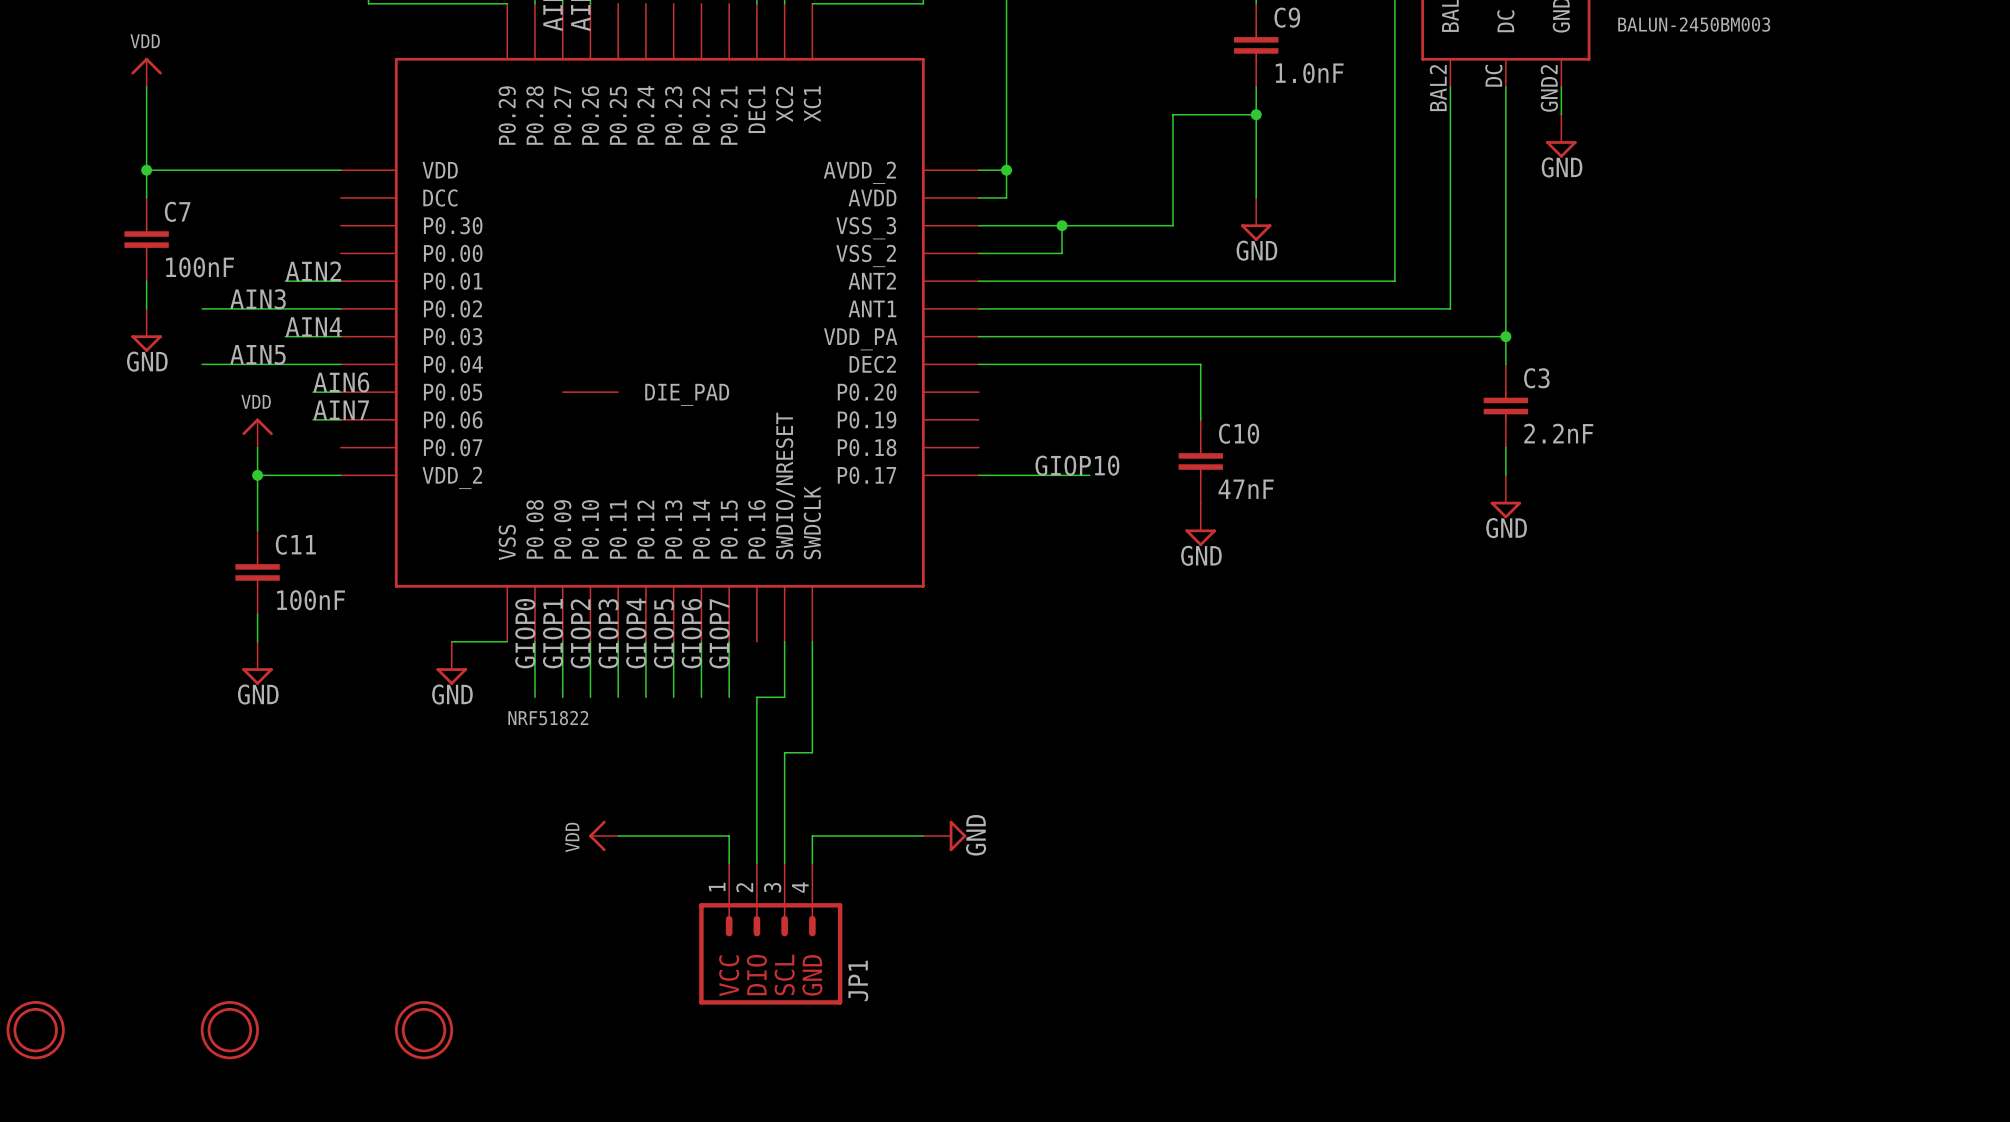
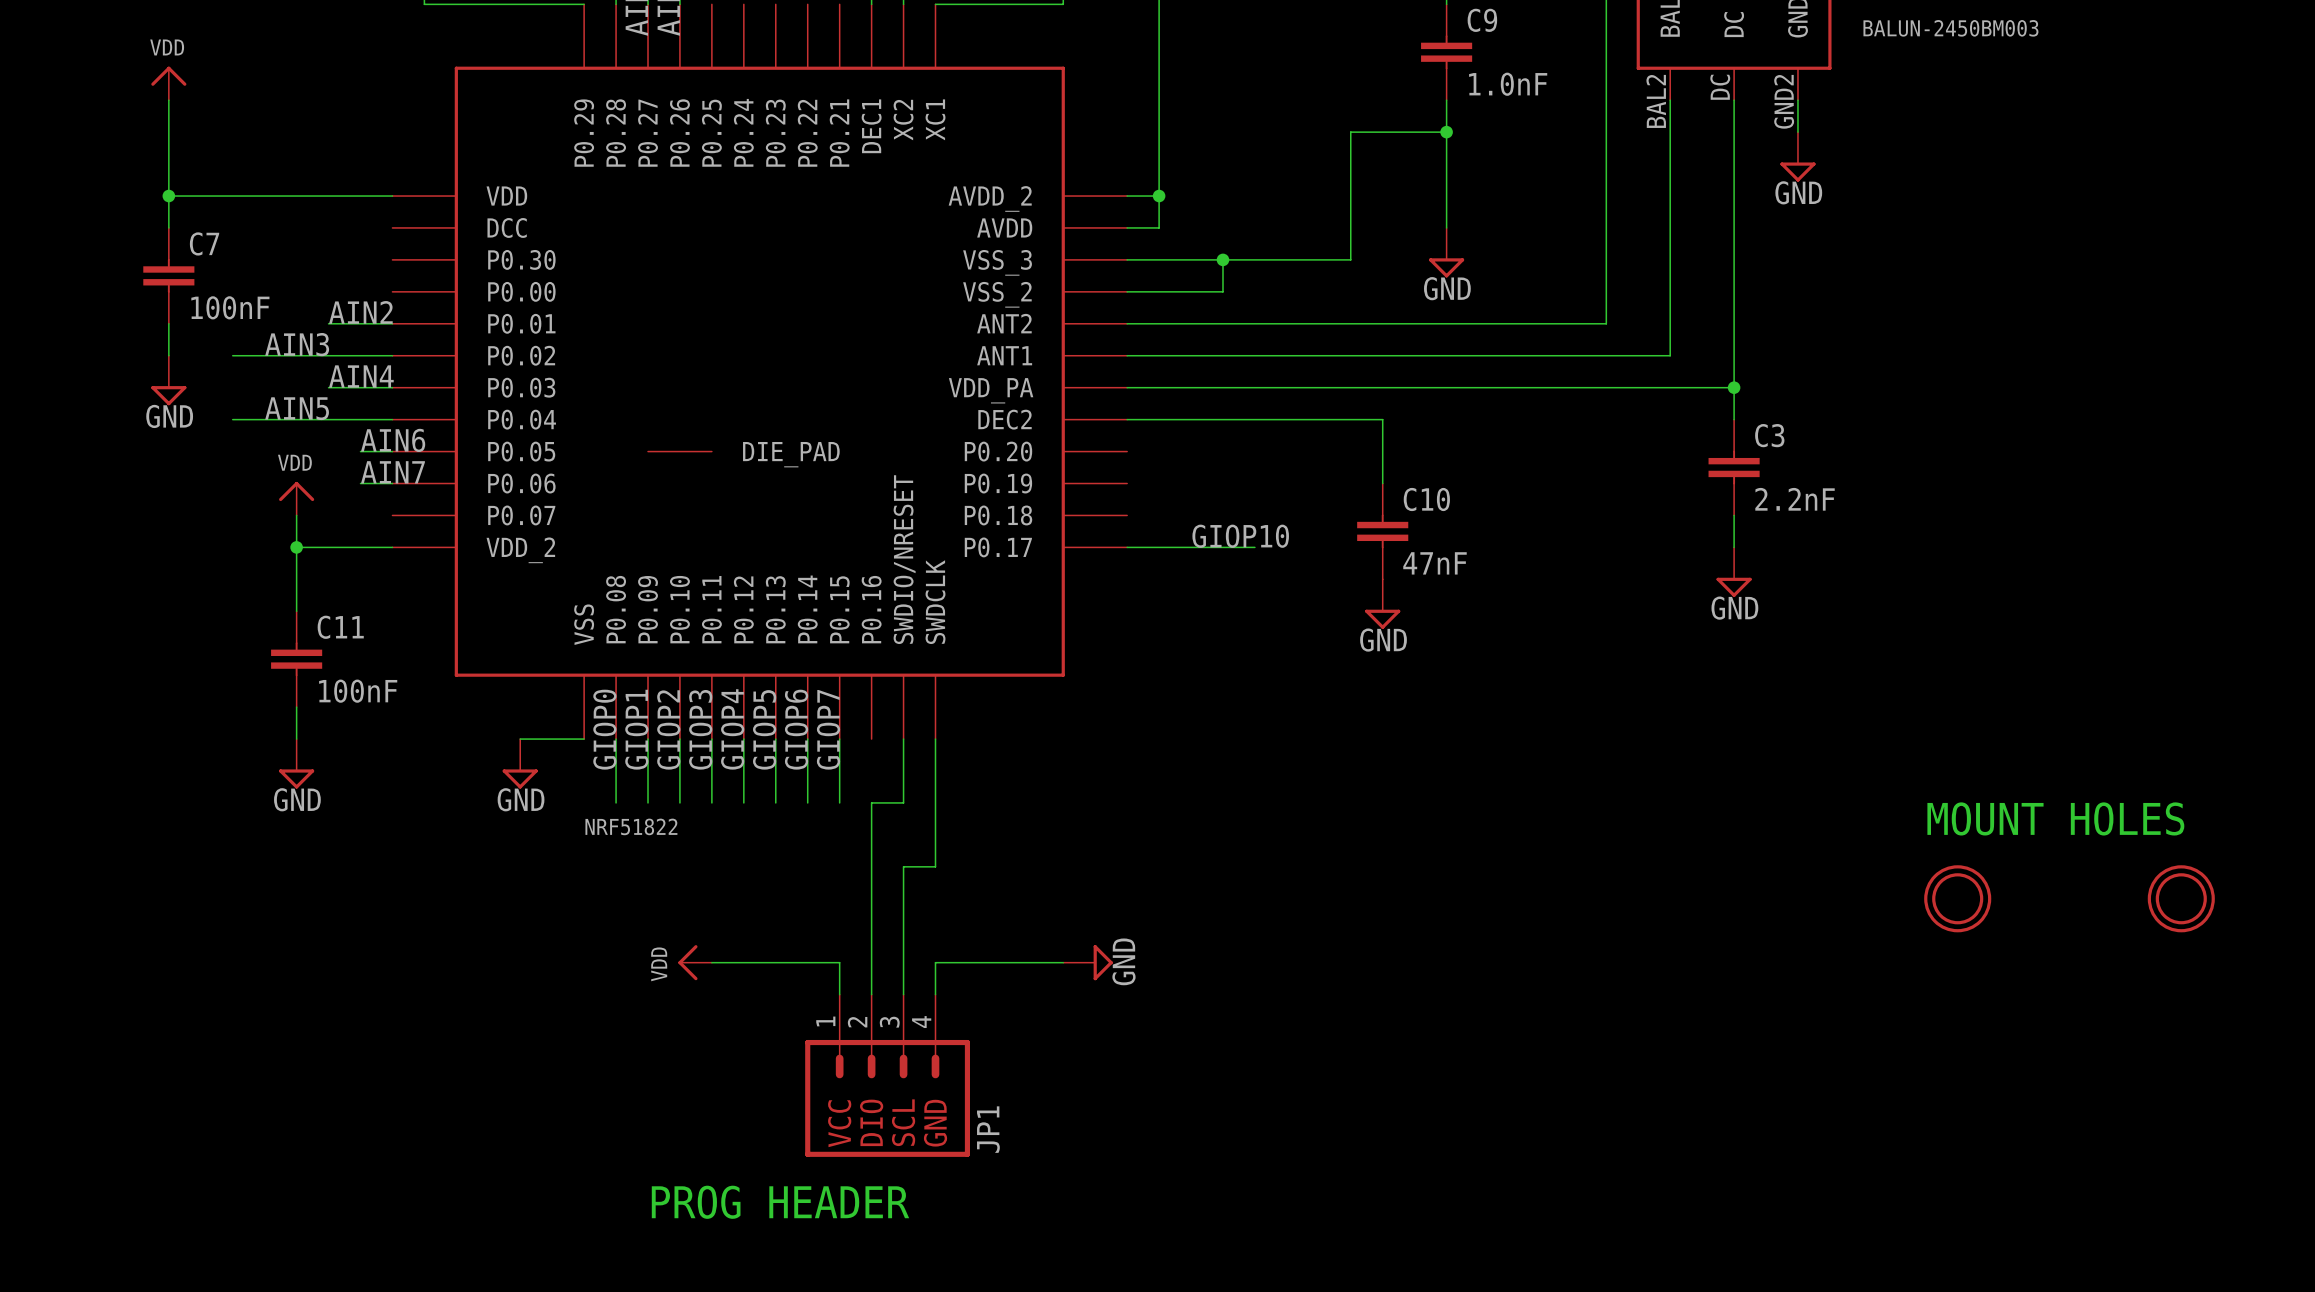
text: none -> MOUNT HOLES (2055, 818)
part: none -> (1957, 898)
part: none -> (2181, 898)
part: (35, 1030) -> none
part: (229, 1030) -> none
part: (424, 1030) -> none
text: none -> PROG HEADER (780, 1202)

